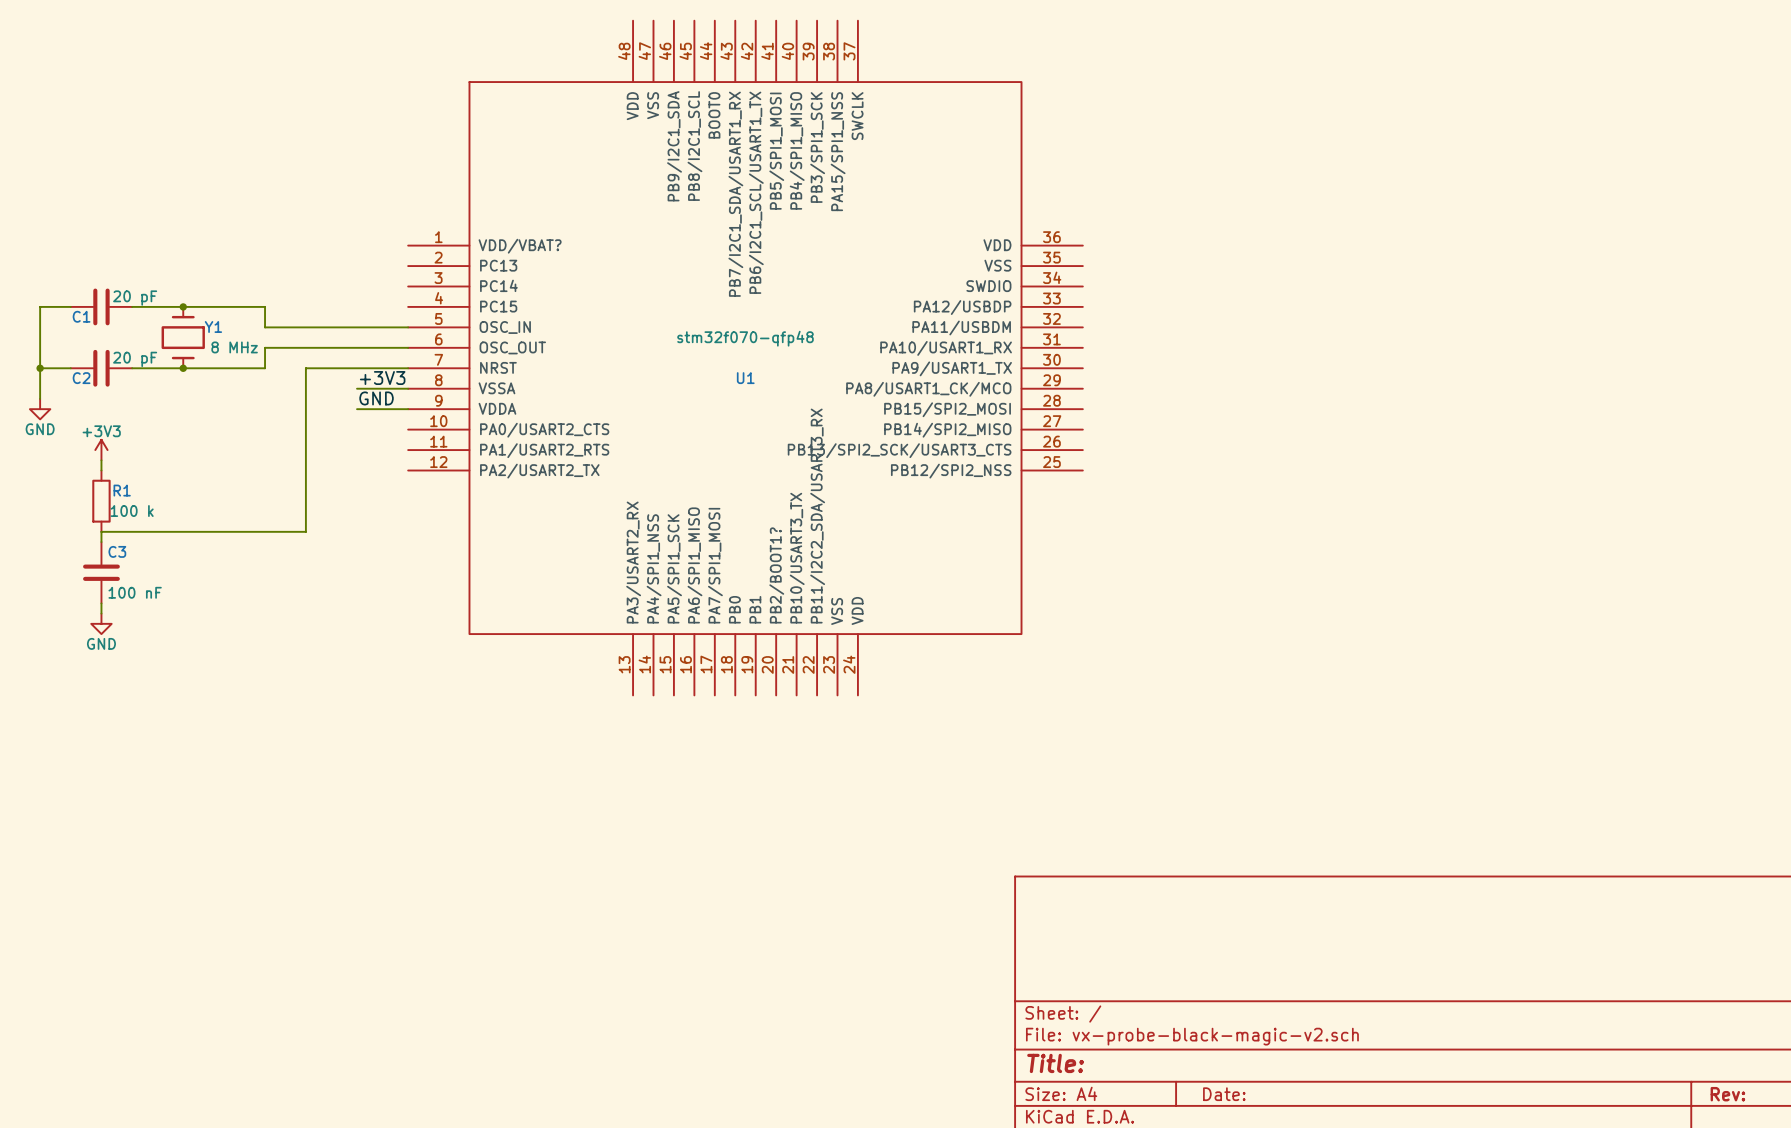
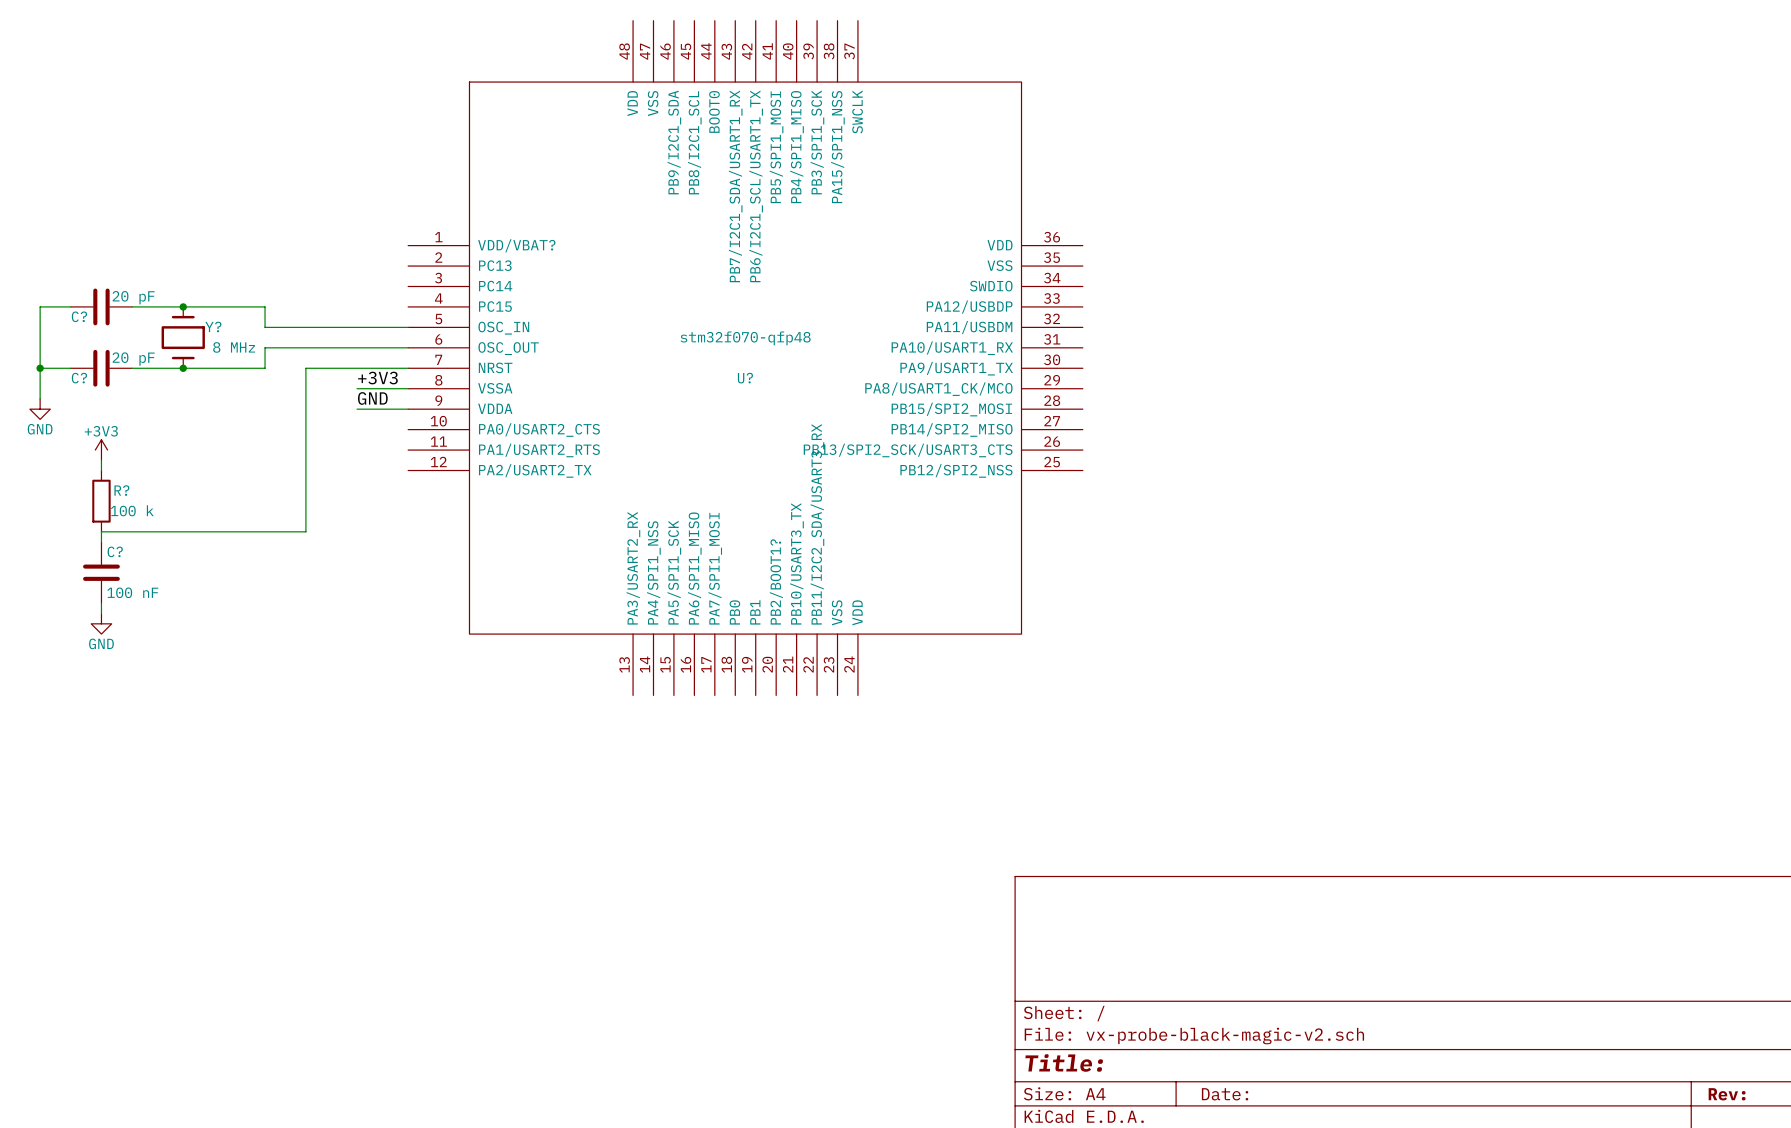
C1 name: C1 (81, 316) -> C? (79, 316)
Y1 name: Y1 (213, 327) -> Y? (213, 326)
C2 name: C2 (81, 378) -> C? (79, 378)
U1 name: U1 (745, 378) -> U? (745, 378)
R1 name: R1 (122, 490) -> R? (121, 490)
C3 name: C3 (117, 551) -> C? (115, 551)

